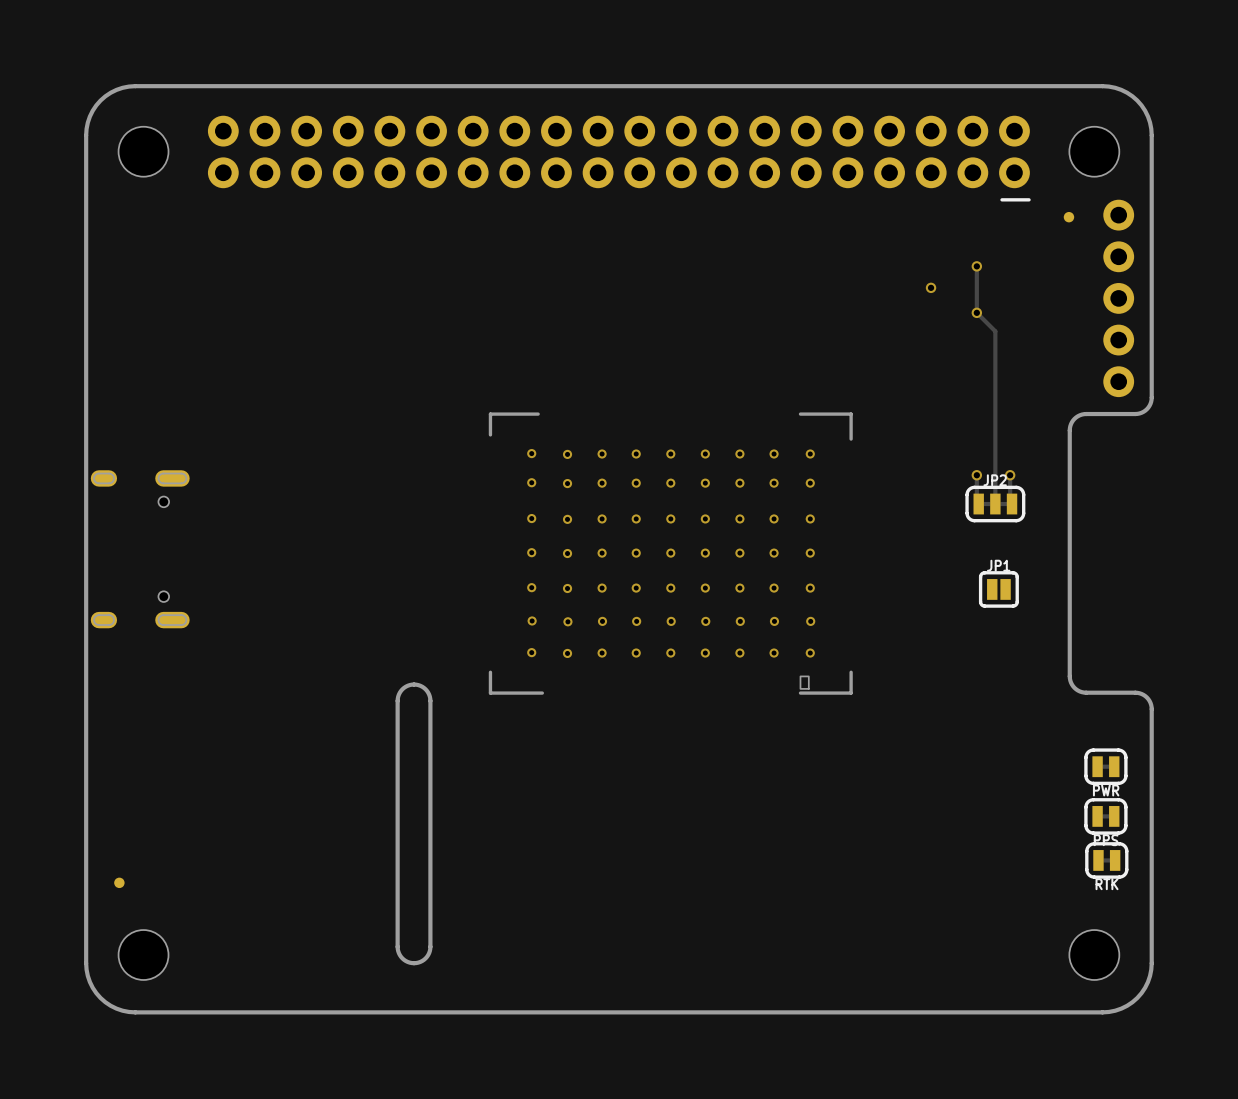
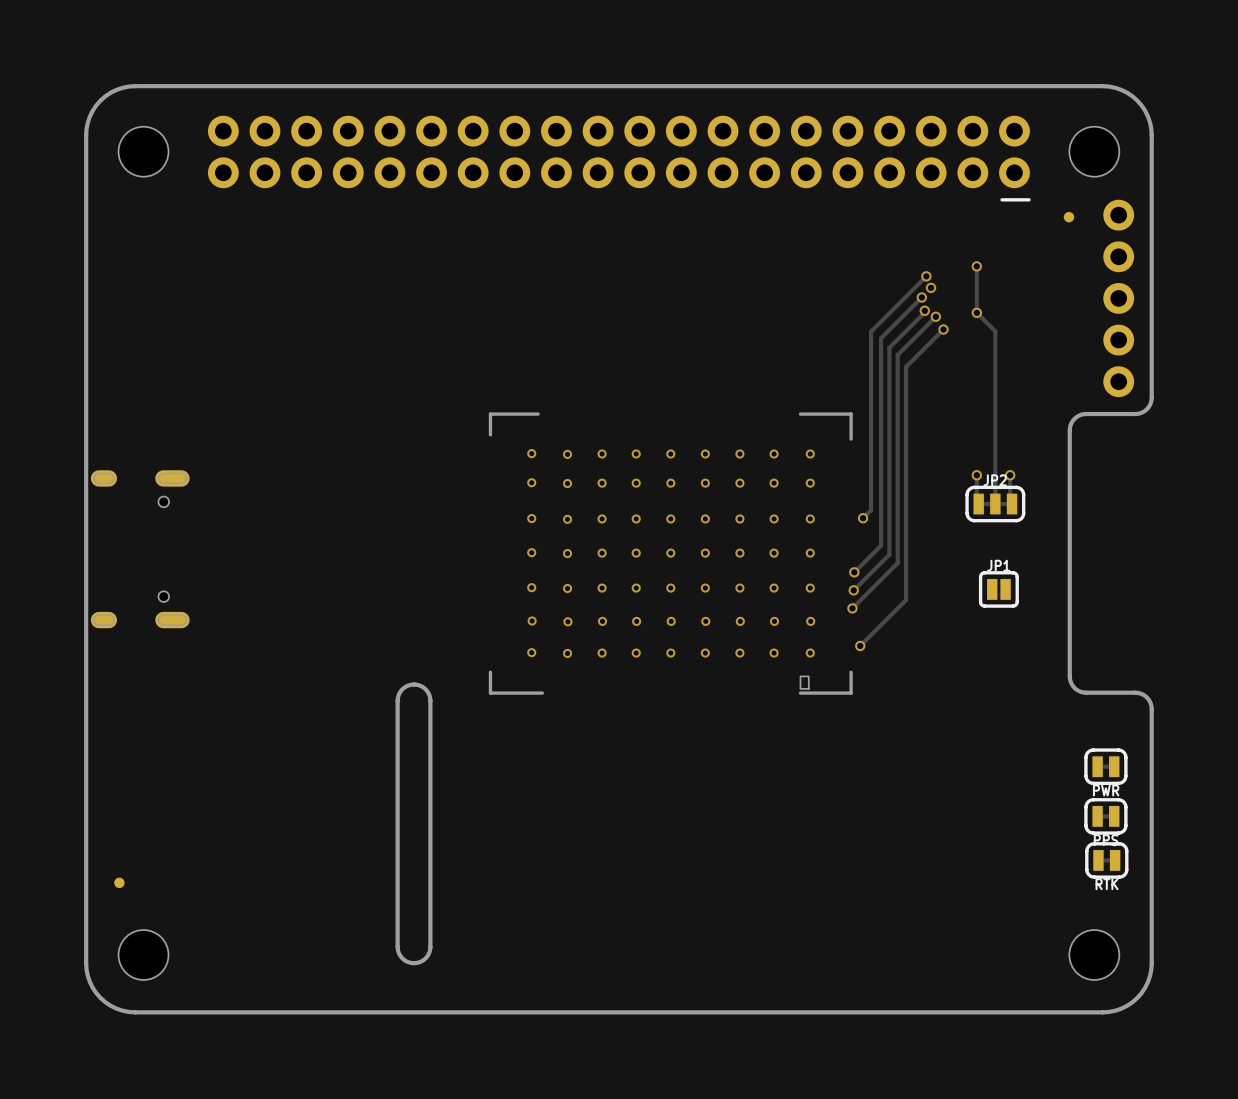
track: none -> (926, 276) (871, 331) (871, 510) (863, 518)
via: none -> (926, 276)
track: none -> (921, 297) (881, 338) (881, 545) (854, 572)
via: none -> (921, 297)
track: none -> (924, 310) (889, 347) (889, 554) (853, 590)
via: none -> (924, 310)
track: none -> (935, 316) (897, 354) (897, 563) (852, 608)
via: none -> (935, 316)
track: none -> (943, 329) (906, 366) (906, 600) (860, 645)
via: none -> (943, 329)
via: none -> (863, 518)
via: none -> (854, 572)
via: none -> (853, 590)
via: none -> (852, 608)
via: none -> (860, 645)

